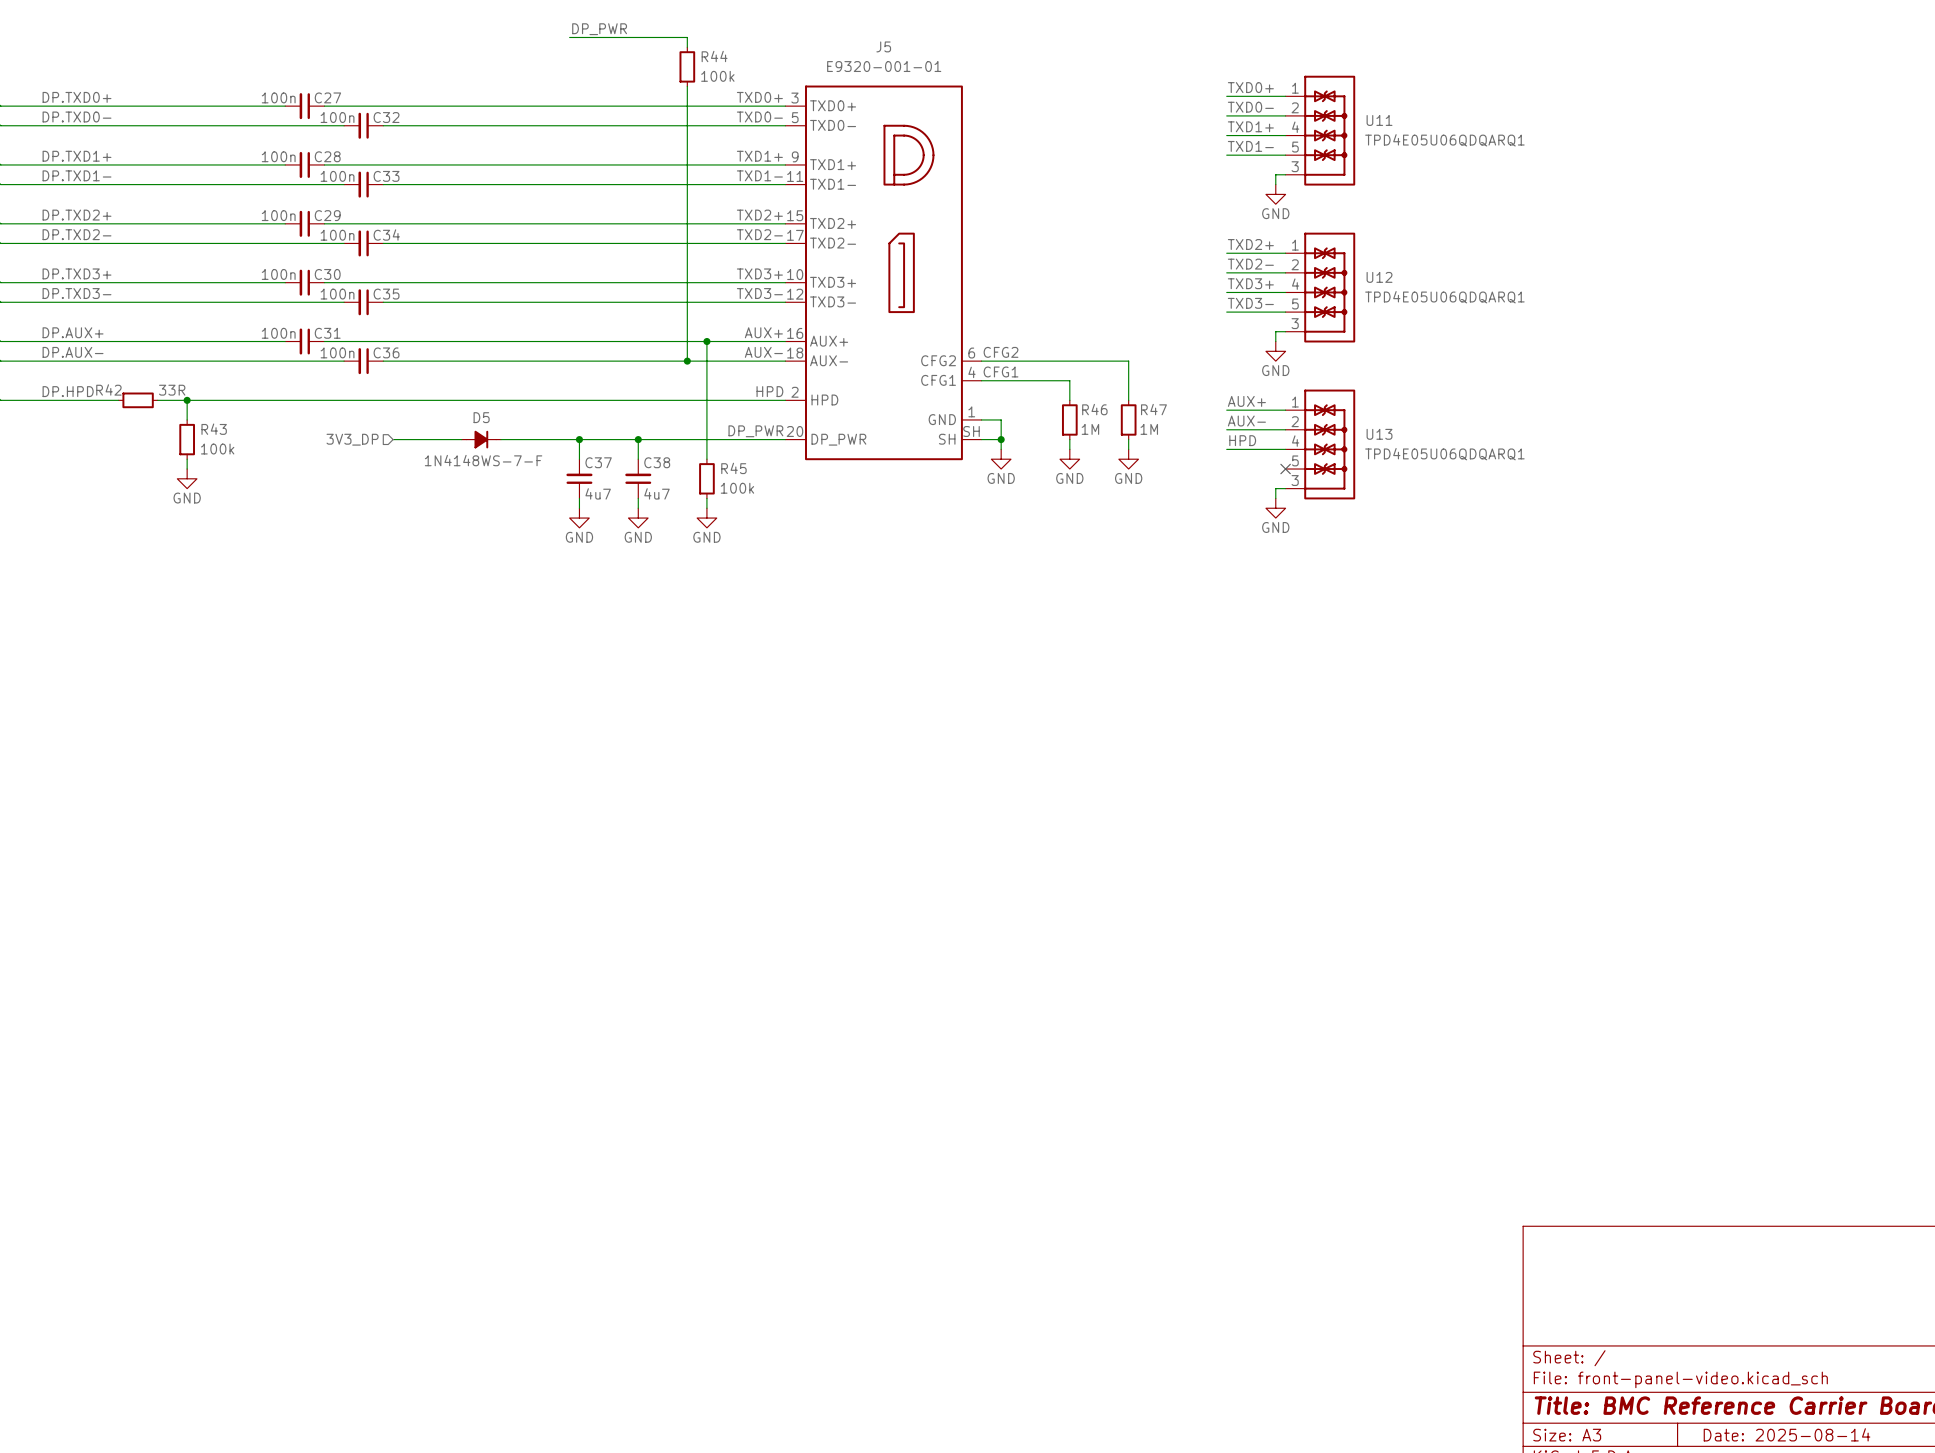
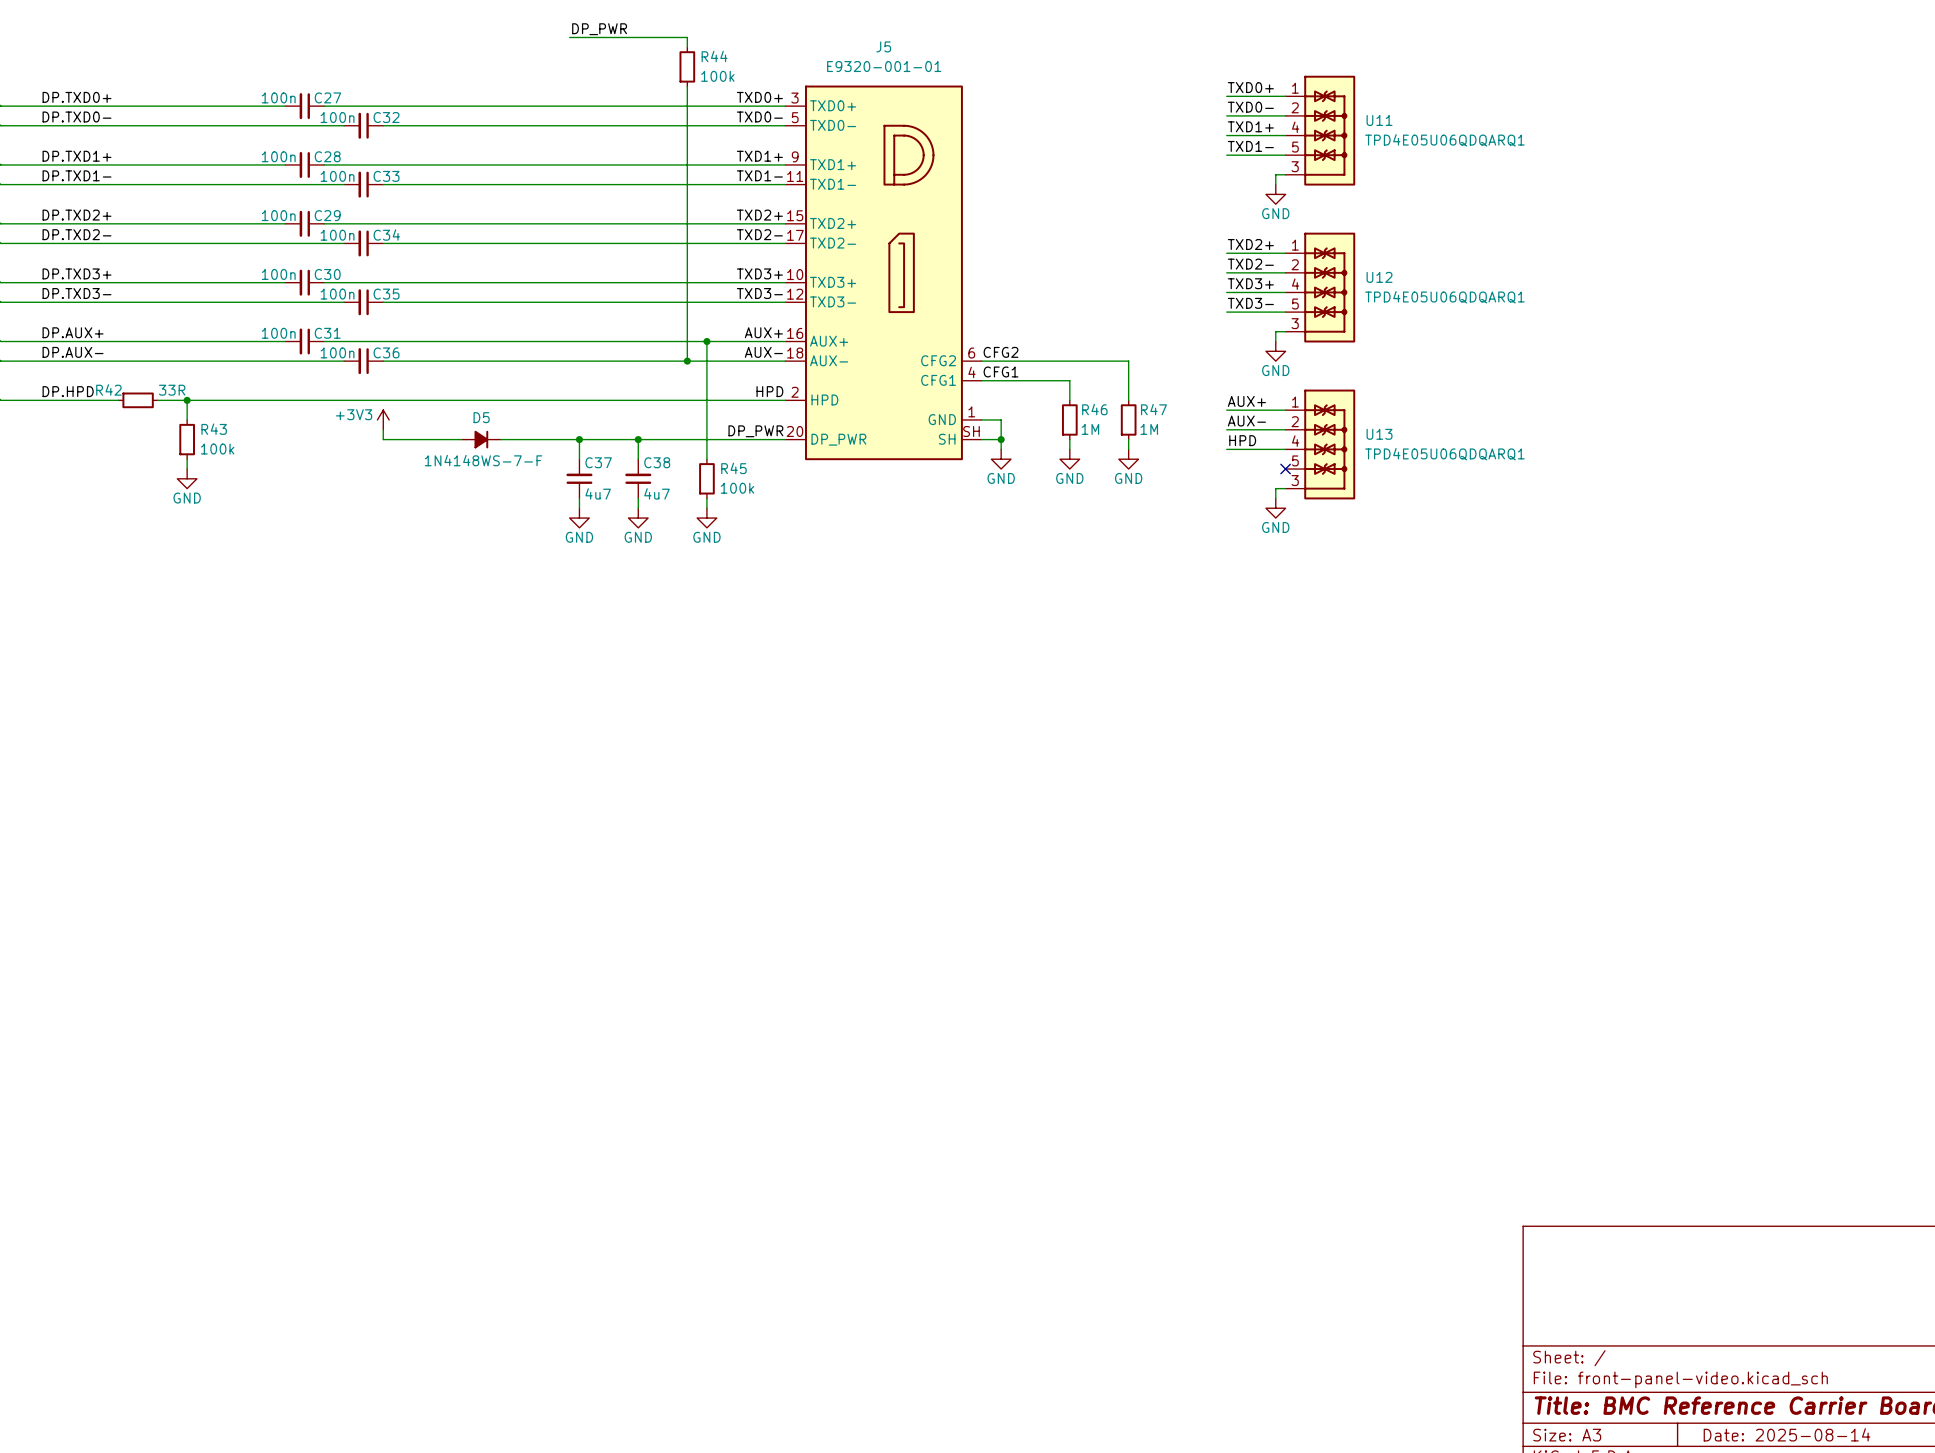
power symbol: none -> +3V3 (383, 419)
wire: none -> (383, 429) (383, 439) (393, 439)
hierarchical label: 3V3_DP (352, 439) -> none

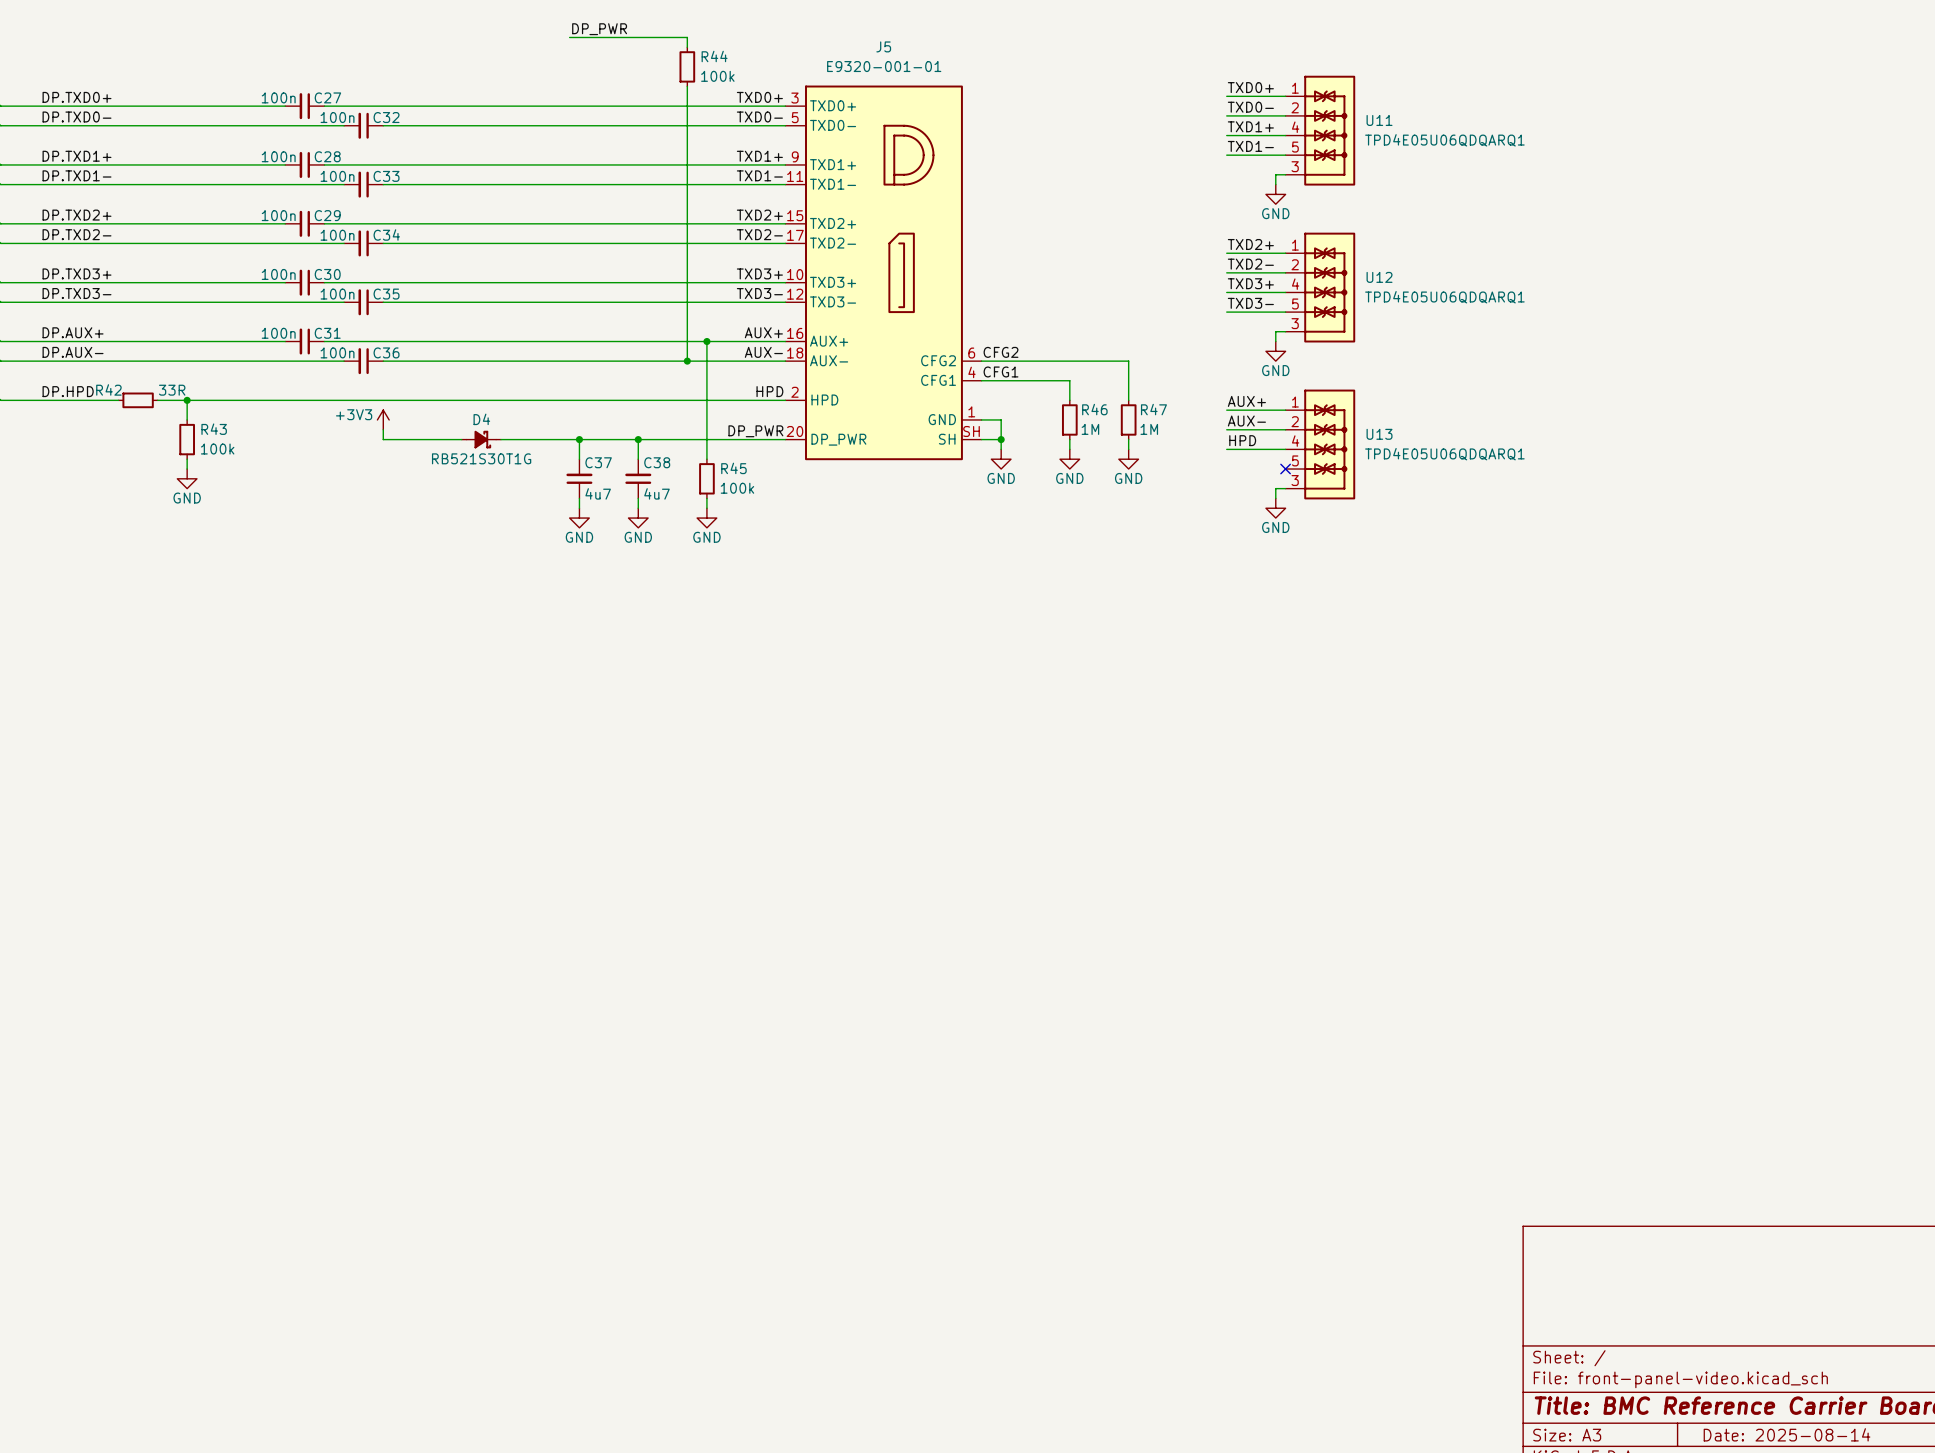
D5: (481, 439) -> none
D4: none -> (481, 439)

